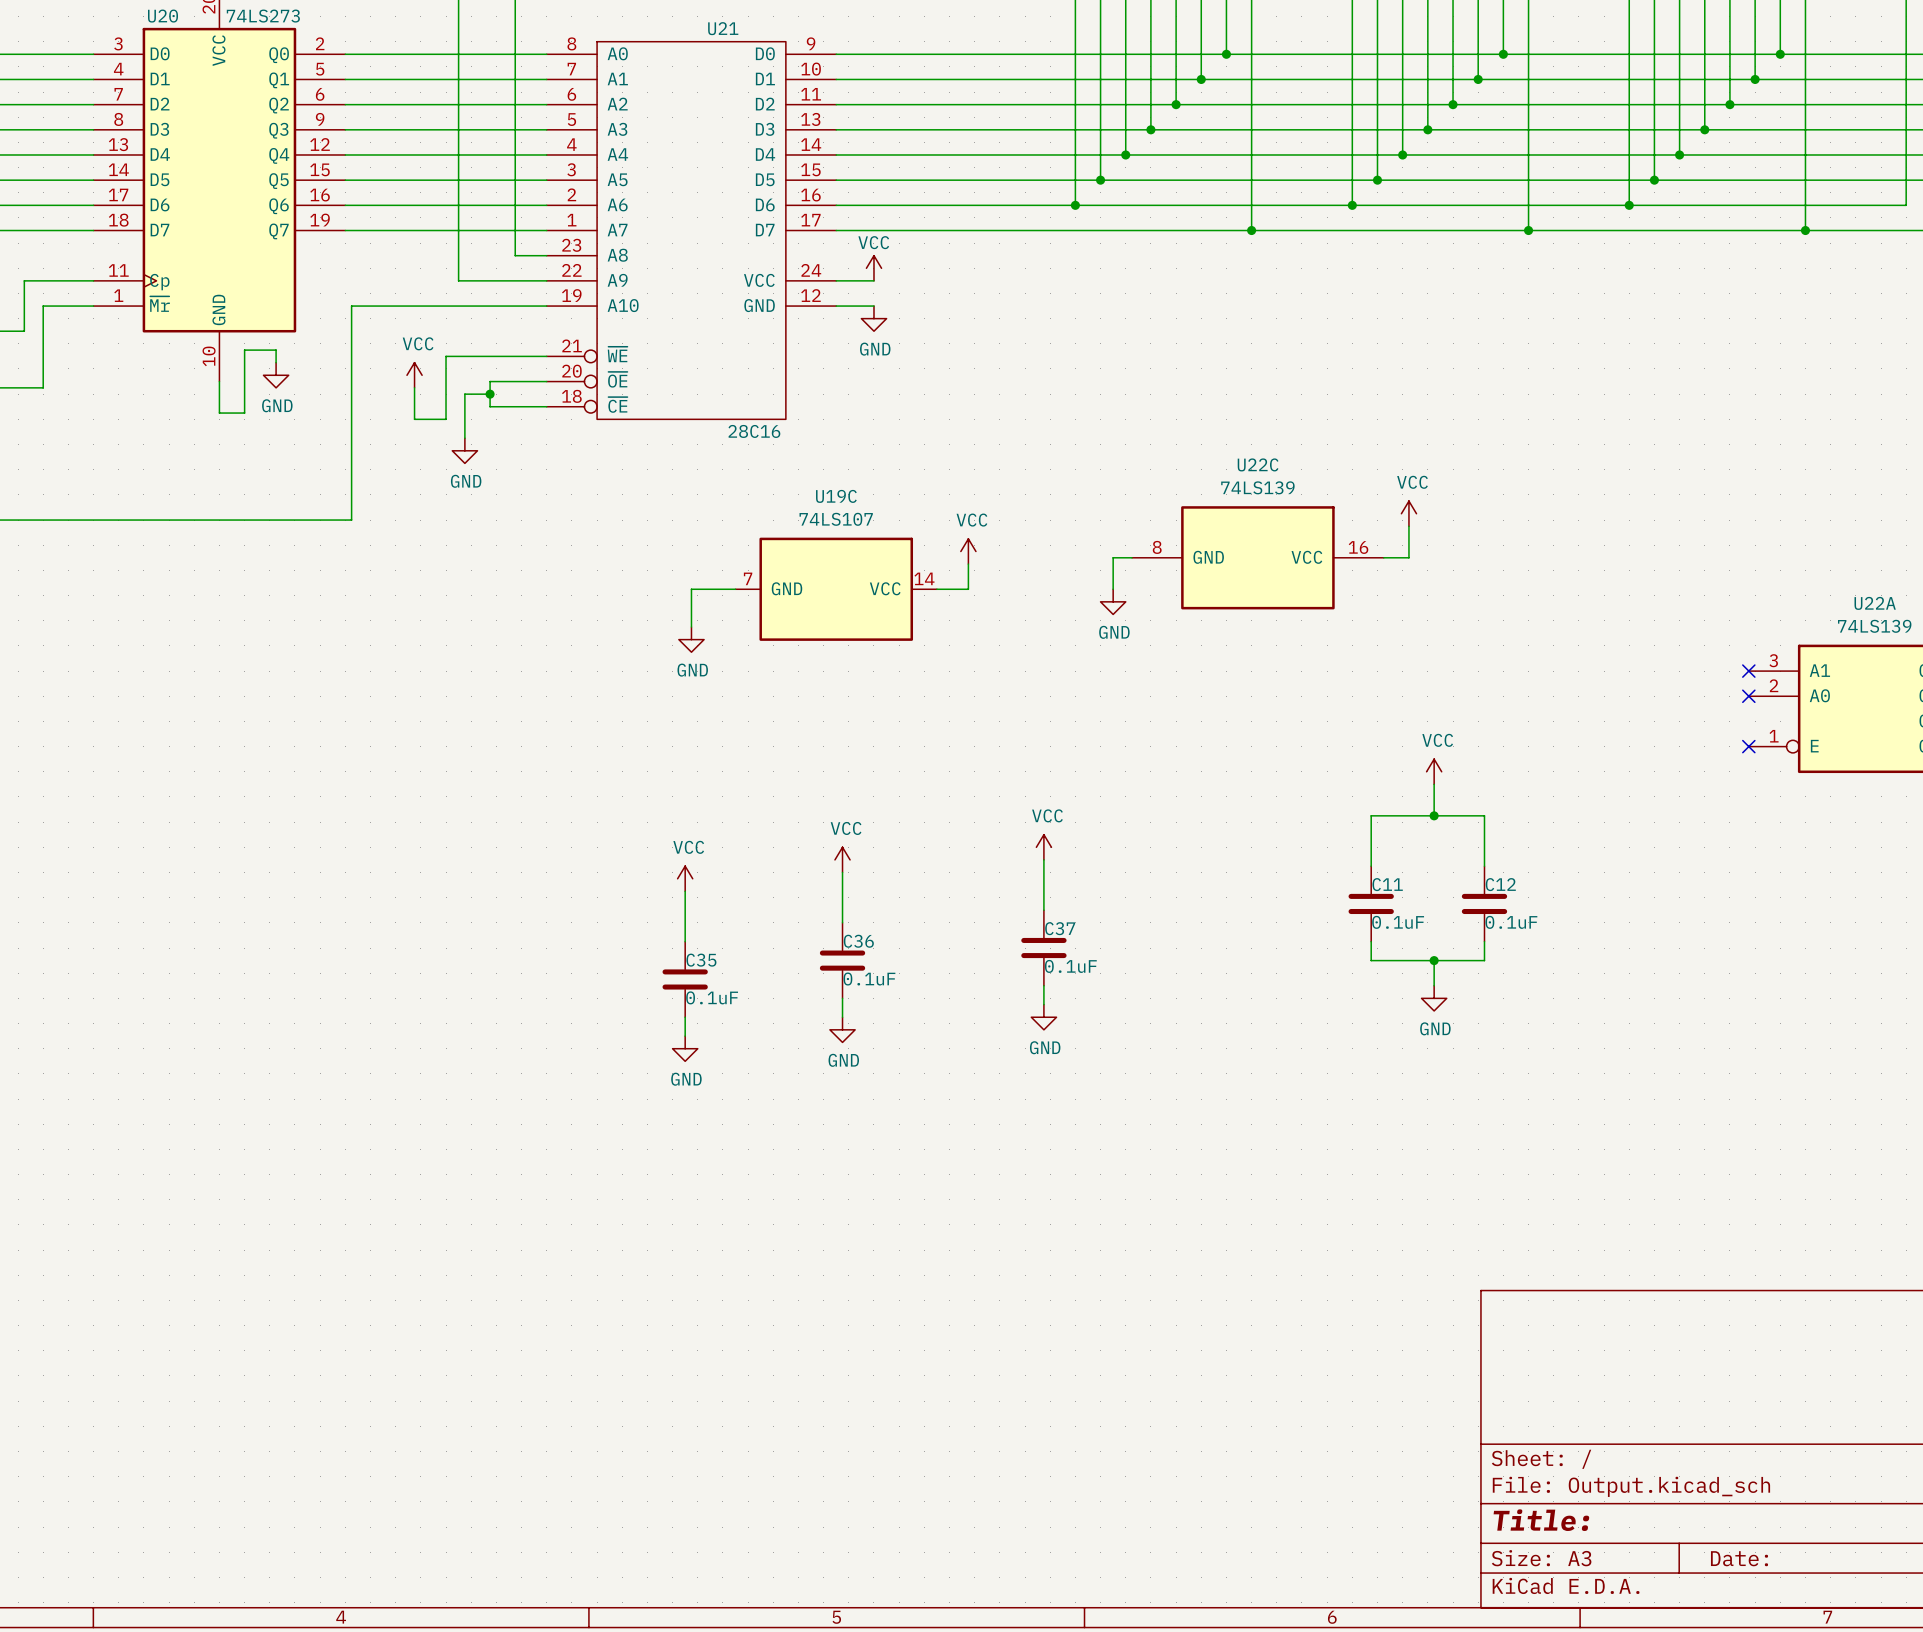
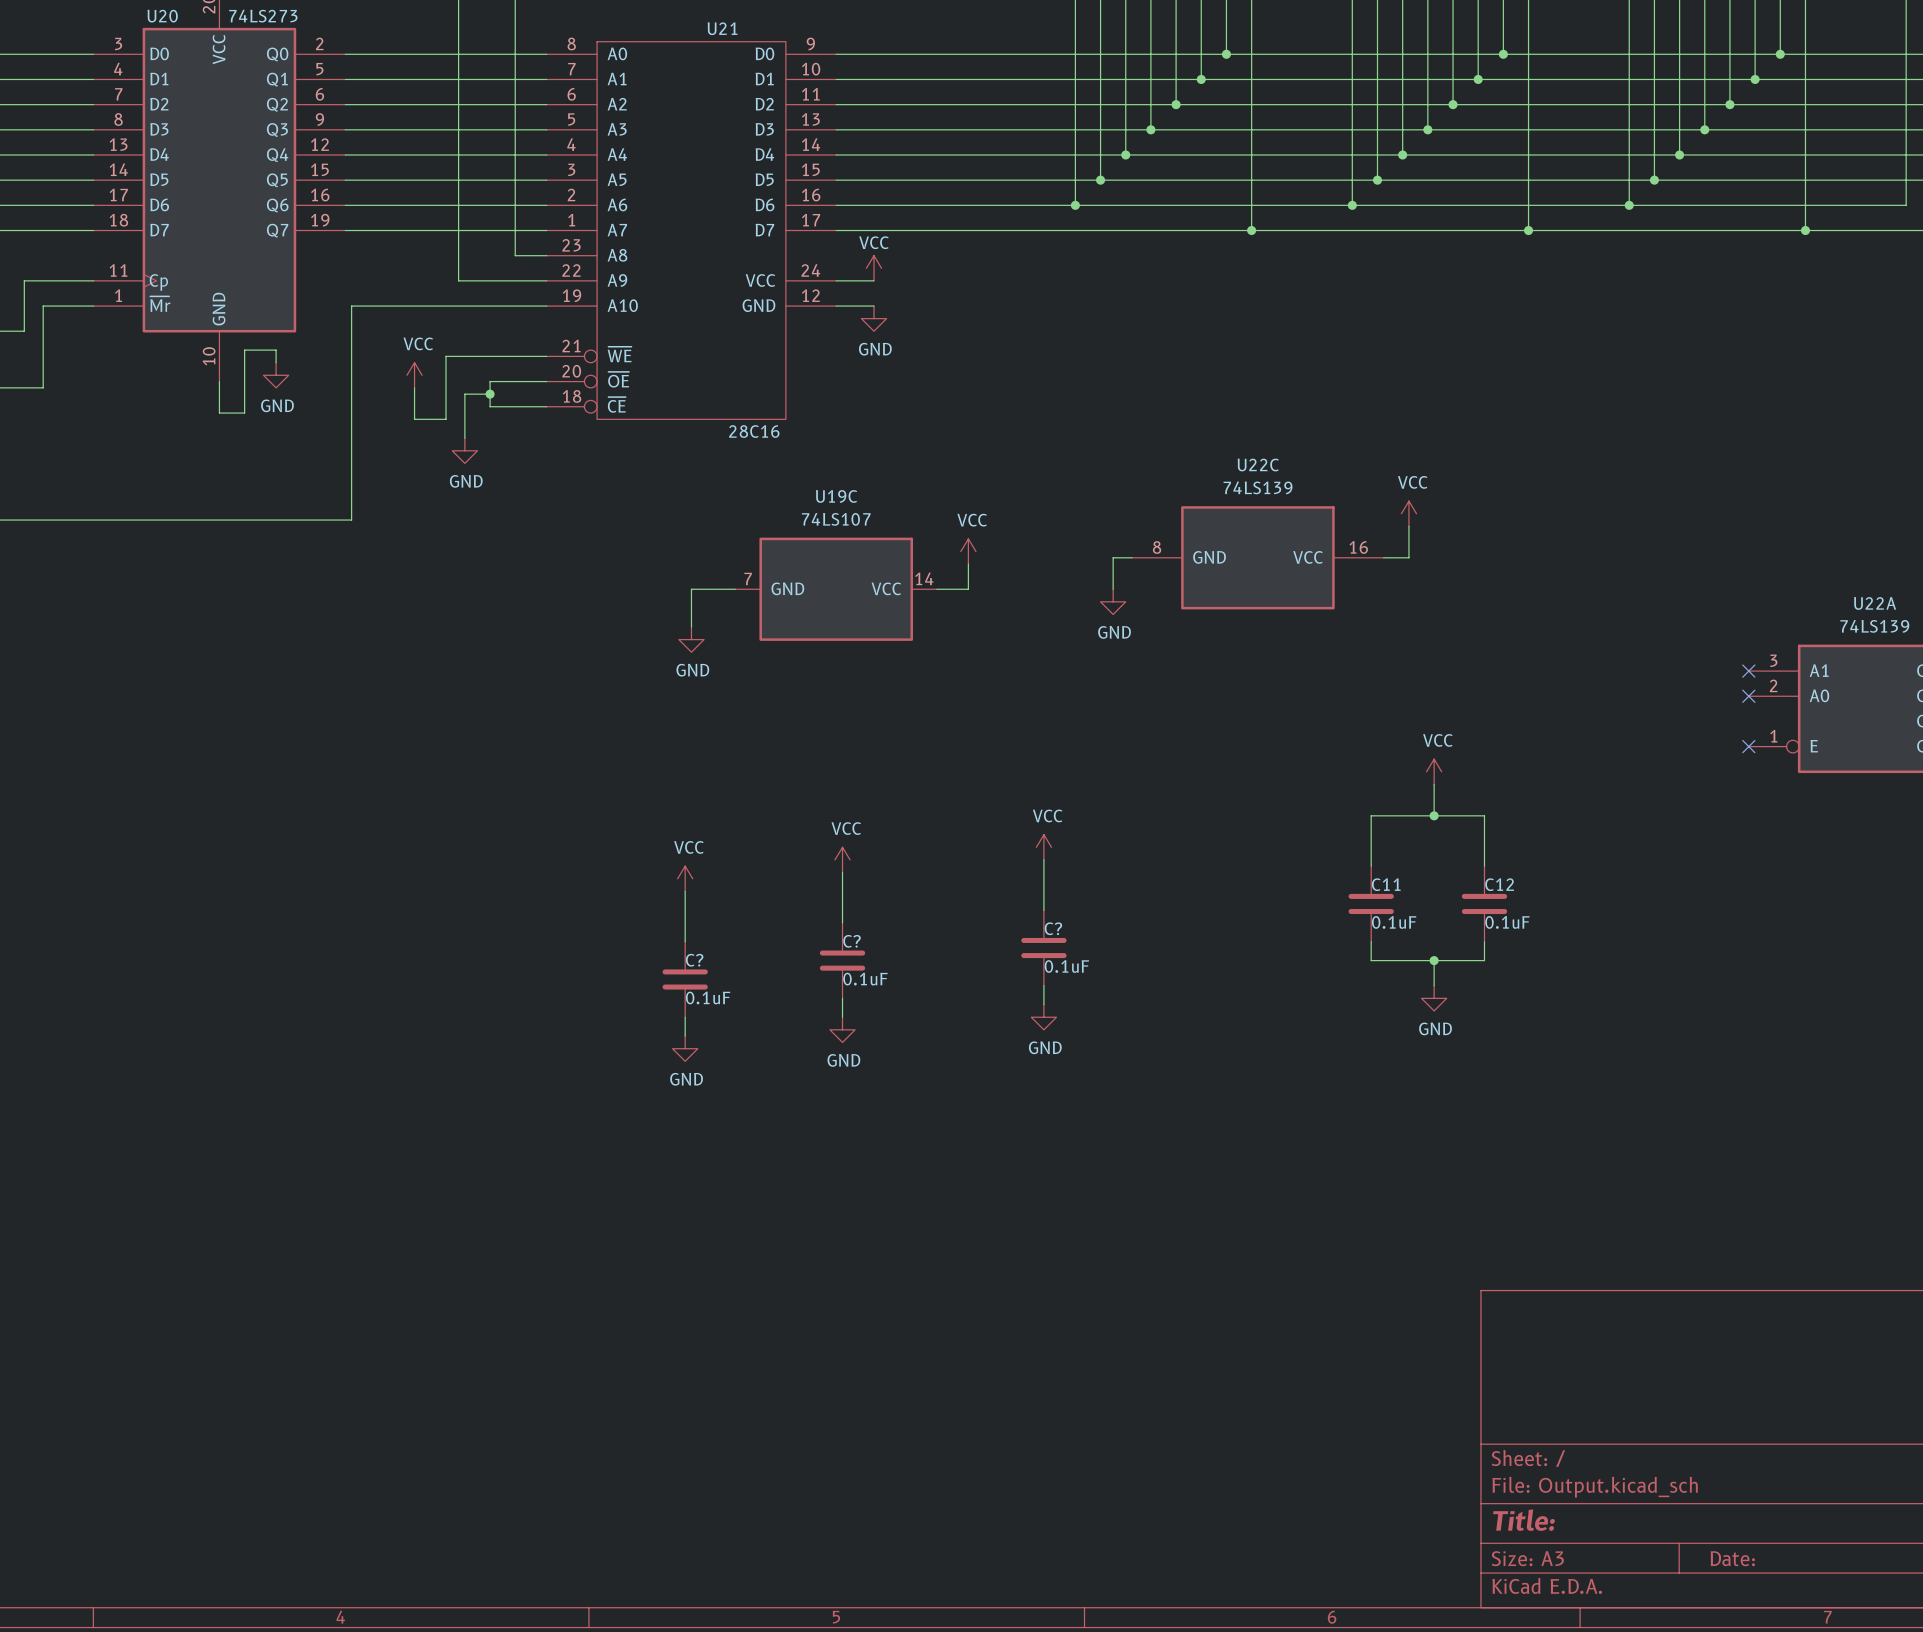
C37 name: C37 (1060, 928) -> C? (1053, 928)
C36 name: C36 (858, 941) -> C? (852, 941)
C35 name: C35 (701, 960) -> C? (694, 960)

